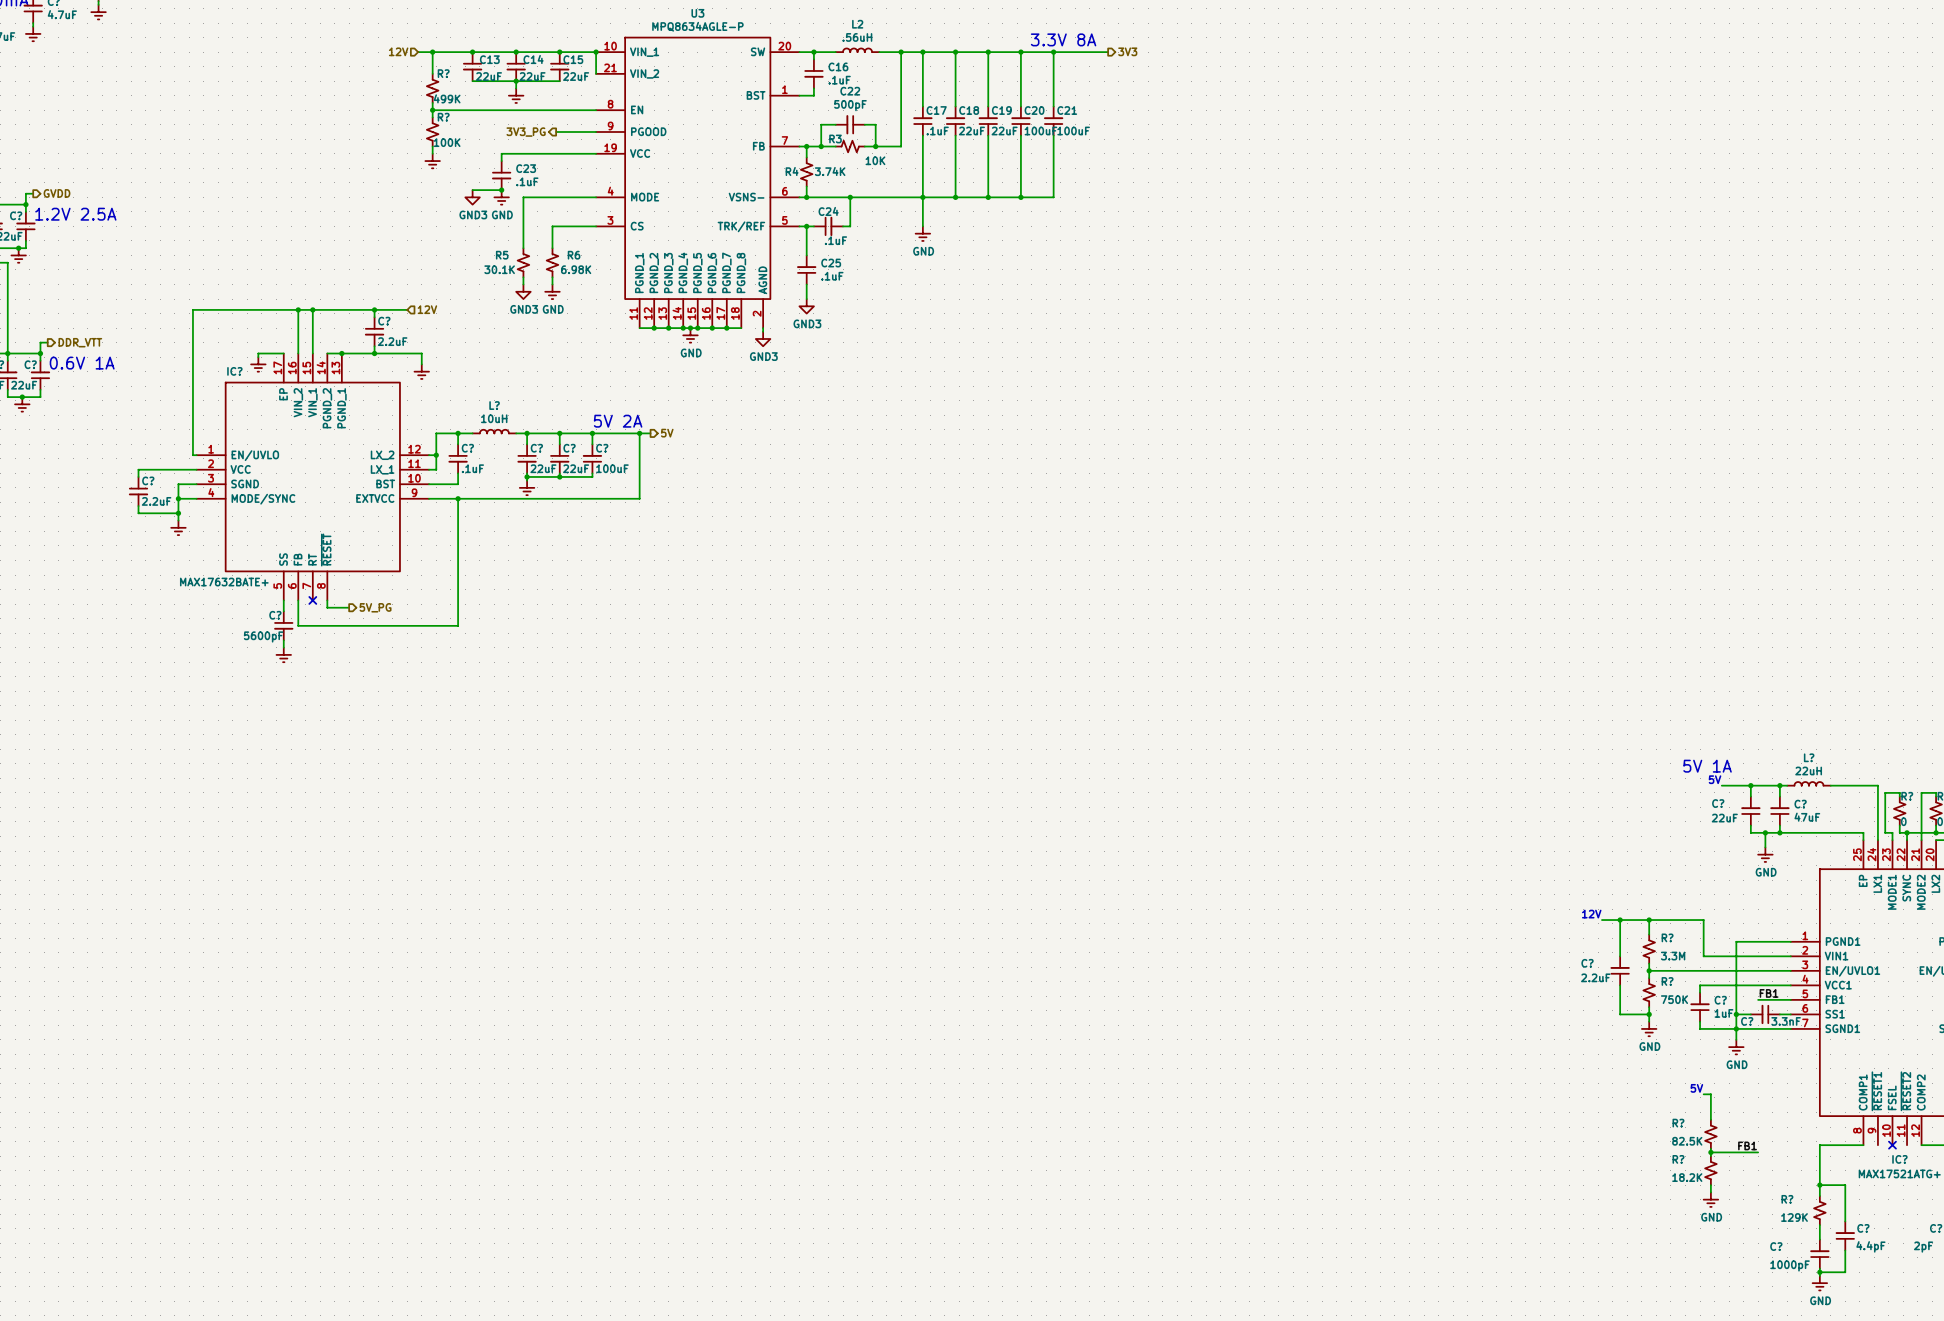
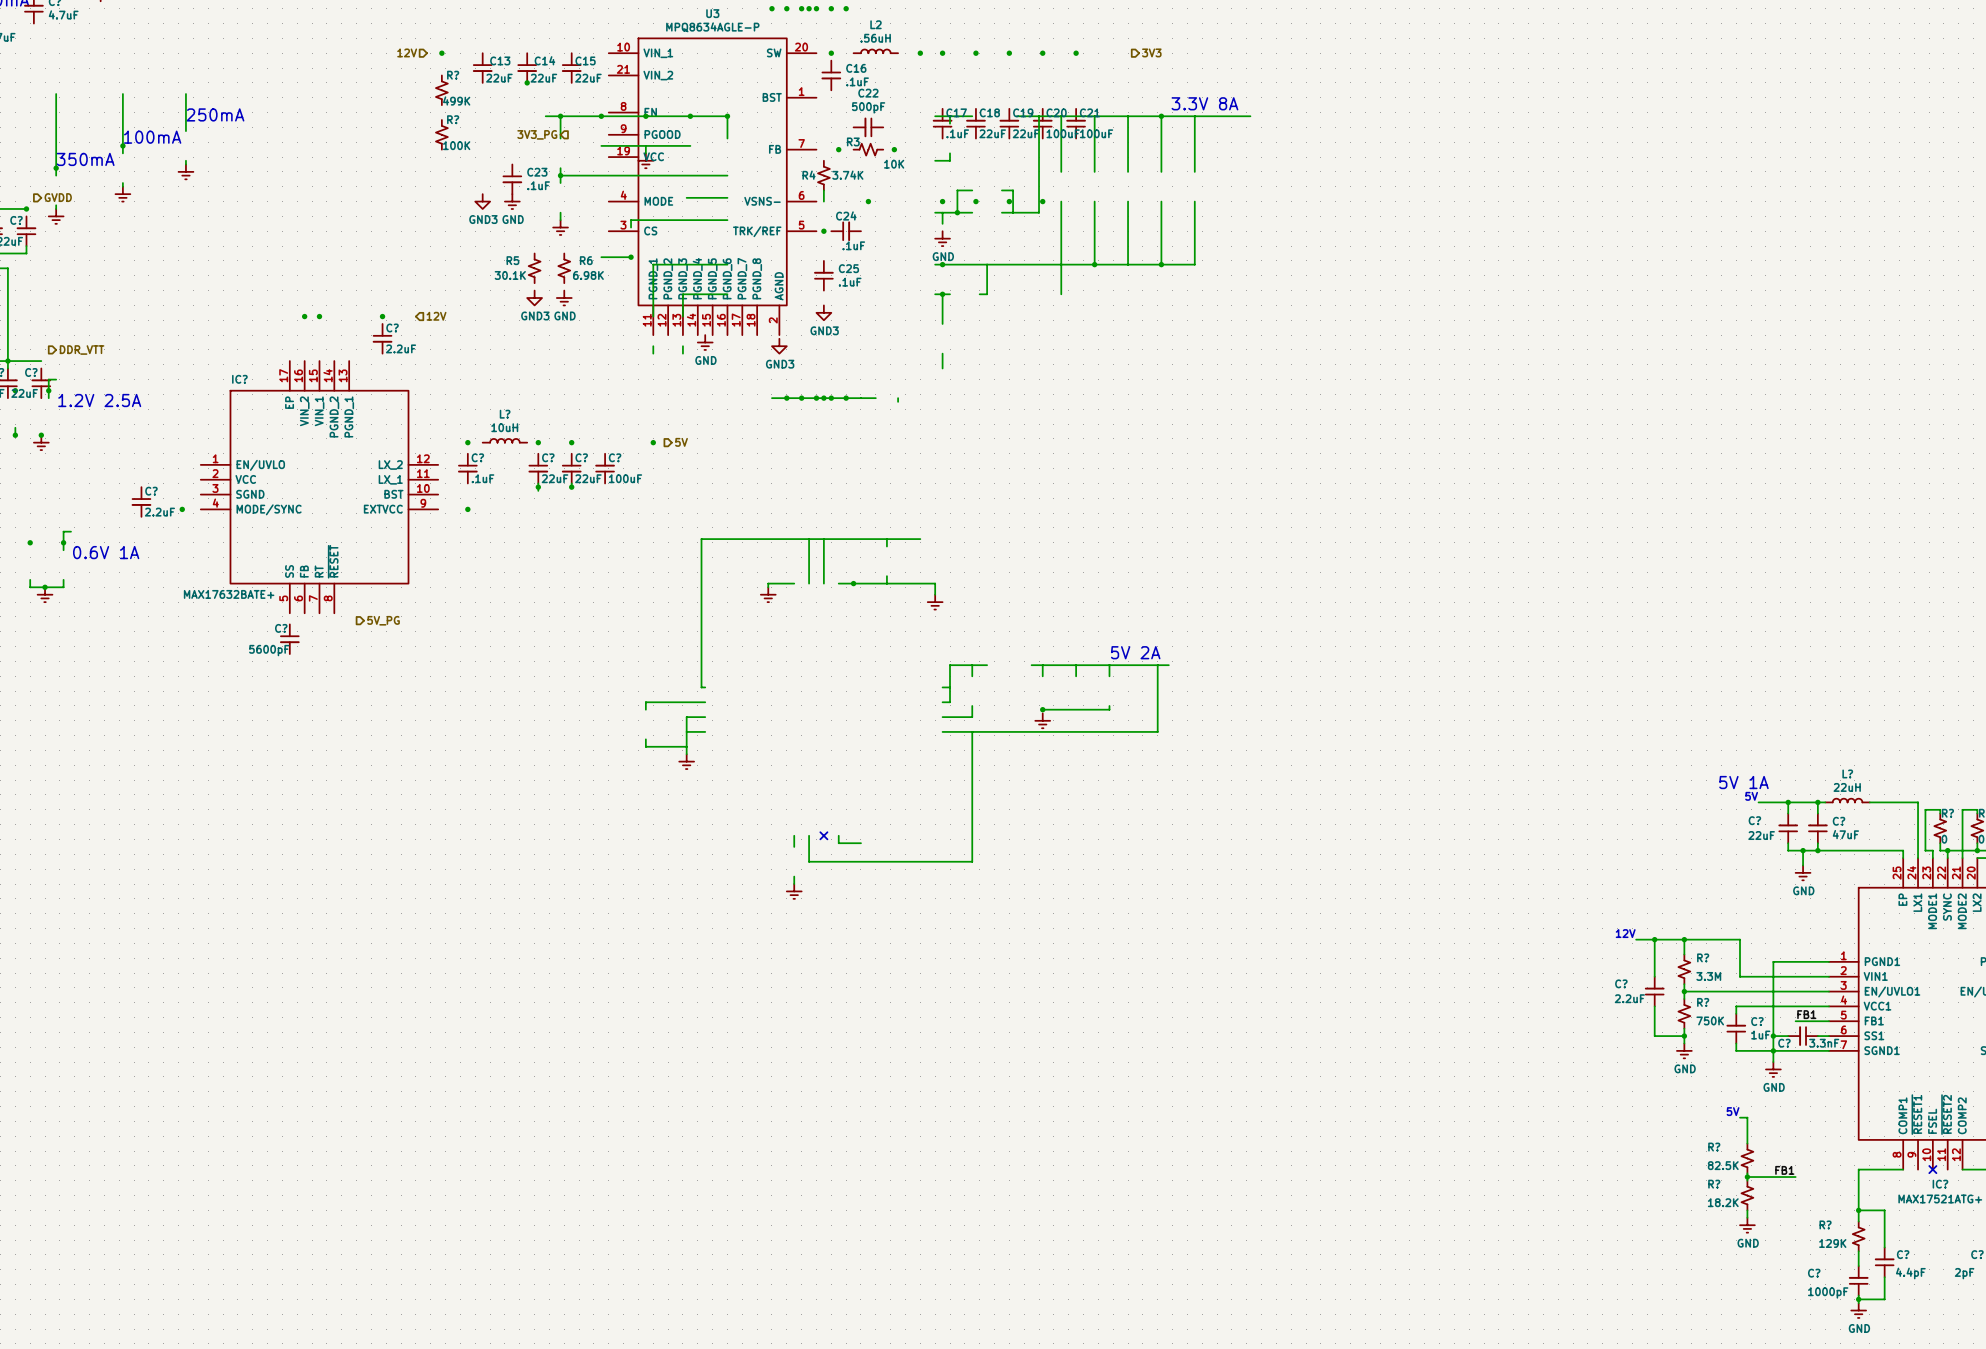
wire: (98, 1) (98, 4) -> none
junction: none -> (771, 8)
junction: none -> (786, 8)
junction: none -> (801, 8)
junction: none -> (809, 8)
junction: none -> (816, 8)
junction: none -> (831, 8)
junction: none -> (846, 8)
power symbol: (98, 12) -> none
wire: (33, 23) (33, 26) -> none
power symbol: (33, 33) -> none
text position: 3.3V 8A (1063, 39) -> 3.3V 8A (1204, 103)
wire: (418, 52) (596, 52) (596, 73) -> (545, 116) (727, 116) (727, 138)
wire: (432, 52) (432, 73) -> (560, 116) (560, 138)
junction: (472, 52) -> none
junction: (516, 52) -> none
junction: (559, 52) -> none
junction: (596, 52) -> none
wire: (799, 52) (835, 52) -> (935, 116) (972, 116)
wire: (813, 52) (813, 59) -> (950, 116) (950, 123)
wire: (879, 52) (1108, 52) -> (1016, 116) (1250, 116)
wire: (901, 52) (901, 146) (864, 146) -> (1039, 116) (1039, 212) (1001, 212)
wire: (922, 52) (922, 106) -> (1061, 116) (1061, 171)
wire: (955, 52) (955, 106) -> (1094, 116) (1094, 171)
wire: (988, 52) (988, 106) -> (1128, 116) (1128, 171)
wire: (1020, 52) (1020, 106) -> (1161, 116) (1161, 171)
wire: (1053, 52) (1053, 106) -> (1194, 116) (1194, 171)
wire: (472, 81) (559, 81) -> (601, 145) (690, 145)
wire: (516, 81) (516, 88) -> (645, 145) (645, 153)
wire: (813, 88) (813, 95) (799, 95) -> (950, 153) (950, 160) (935, 160)
wire: none -> (56, 94) (56, 175)
wire: none -> (122, 94) (122, 153)
wire: none -> (185, 94) (185, 131)
power symbol: (516, 95) -> none
wire: (432, 102) (432, 117) -> (560, 168) (560, 183)
wire: (432, 110) (596, 110) -> (560, 175) (727, 175)
junction: (432, 110) -> none
text: none -> 250mA (215, 114)
junction: none -> (560, 116)
junction: none -> (601, 116)
junction: none -> (645, 116)
junction: none -> (690, 116)
junction: none -> (727, 116)
junction: none -> (1161, 116)
wire: (835, 124) (821, 124) (821, 146) -> (972, 190) (957, 190) (957, 212)
wire: (864, 124) (875, 124) (875, 146) -> (1001, 190) (1013, 190) (1013, 212)
wire: (556, 131) (596, 131) -> (686, 197) (727, 197)
text: none -> 100mA (152, 137)
wire: (922, 135) (922, 208) -> none
wire: (955, 135) (955, 197) -> (1094, 201) (1094, 264)
wire: (988, 135) (988, 197) -> (1128, 201) (1128, 264)
wire: (1020, 135) (1020, 197) -> (1161, 201) (1161, 264)
wire: (1053, 135) (1053, 197) (799, 197) -> (1194, 201) (1194, 264) (935, 264)
junction: none -> (122, 145)
wire: (432, 146) (432, 153) -> (560, 212) (560, 220)
wire: (799, 146) (835, 146) -> (935, 212) (972, 212)
wire: (806, 146) (806, 157) -> none
junction: (806, 146) -> none
wire: (596, 153) (501, 153) (501, 161) -> (727, 220) (631, 220) (631, 227)
text: none -> 350mA (85, 159)
wire: none -> (185, 160) (185, 164)
power symbol: none -> (645, 160)
power symbol: (432, 161) -> none
junction: none -> (56, 168)
power symbol: none -> (185, 171)
junction: none -> (560, 175)
wire: none -> (122, 183) (122, 186)
power symbol: none -> (122, 194)
wire: (472, 190) (501, 190) -> (601, 257) (631, 257)
junction: (501, 190) -> none
wire: (33, 193) (25, 193) (25, 211) -> none
wire: (596, 197) (523, 197) (523, 248) -> (727, 264) (653, 264) (653, 316)
junction: (806, 197) -> none
wire: (850, 197) (850, 226) (843, 226) -> (987, 264) (987, 294) (979, 294)
wire: none -> (1061, 201) (1061, 294)
wire: none -> (56, 205) (56, 208)
junction: none -> (957, 212)
power symbol: none -> (56, 216)
text: 1.2V 2.5A (75, 214) -> none
wire: (922, 219) (922, 226) -> none
power symbol: none -> (560, 227)
wire: (596, 226) (552, 226) (552, 248) -> (727, 294) (682, 294) (682, 316)
wire: (799, 226) (813, 226) -> (935, 294) (950, 294)
wire: (806, 226) (806, 255) -> (942, 294) (942, 323)
junction: (18, 248) -> none
junction: none -> (631, 257)
power symbol: (18, 255) -> none
junction: none -> (942, 264)
junction: none -> (1094, 264)
junction: none -> (1161, 264)
wire: (523, 277) (523, 284) -> (653, 346) (653, 353)
wire: (552, 277) (552, 284) -> (682, 346) (682, 353)
wire: (806, 284) (806, 299) -> (942, 353) (942, 368)
junction: none -> (942, 294)
wire: (298, 309) (298, 353) -> none
wire: (312, 309) (312, 353) -> none
wire: (374, 309) (374, 317) -> none
wire: (407, 309) (192, 309) (192, 455) (196, 455) -> none
wire: (639, 328) (741, 328) -> (771, 398) (875, 398)
junction: (654, 328) -> none
junction: (668, 328) -> none
junction: (683, 328) -> none
junction: (690, 328) -> none
junction: (697, 328) -> none
junction: (712, 328) -> none
junction: (726, 328) -> none
wire: (763, 328) (763, 331) -> (898, 398) (898, 401)
wire: (47, 342) (40, 342) (40, 360) -> (56, 379) (48, 379) (48, 398)
wire: (374, 346) (374, 353) -> none
junction: (40, 353) -> none
wire: (283, 353) (258, 353) (258, 357) -> none
wire: (327, 353) (421, 353) (421, 364) -> none
junction: (341, 353) -> none
junction: (374, 353) -> none
text: 0.6V 1A (82, 363) -> none
power symbol: (258, 364) -> none
power symbol: (421, 371) -> none
junction: none -> (15, 390)
junction: none -> (48, 390)
wire: (7, 389) (7, 397) (40, 397) (40, 389) -> none
junction: none -> (786, 398)
junction: none -> (801, 398)
junction: none -> (816, 398)
junction: none -> (823, 398)
junction: none -> (831, 398)
junction: none -> (846, 398)
text: none -> 1.2V 2.5A (99, 400)
junction: (22, 397) -> none
power symbol position: (22, 404) -> (41, 442)
wire: none -> (15, 427) (15, 435)
text: 5V 2A (618, 421) -> none
junction: none -> (15, 435)
junction: none -> (41, 435)
wire: (458, 433) (458, 444) -> none
wire: (472, 433) (436, 433) (436, 469) (429, 469) -> none
wire: (516, 433) (650, 433) -> none
wire: (527, 433) (527, 444) -> none
wire: (559, 433) (559, 444) -> none
wire: (592, 433) (592, 444) -> none
junction: (592, 433) -> none
wire: (639, 433) (639, 498) (429, 498) -> none
wire: (429, 455) (436, 455) -> none
junction: (436, 455) -> none
wire: (196, 469) (138, 469) (138, 476) -> none
wire: (458, 473) (458, 484) (429, 484) -> none
wire: (592, 473) (592, 476) (527, 476) -> none
wire: (196, 484) (178, 484) (178, 520) -> none
power symbol: (527, 487) -> none
wire: (178, 498) (196, 498) -> none
wire: (458, 498) (458, 625) (298, 625) (298, 600) -> none
wire: (138, 506) (138, 513) (178, 513) -> none
junction: (178, 513) -> none
wire: none -> (70, 531) (63, 531) (63, 550)
power symbol: (178, 527) -> none
wire: none -> (809, 539) (809, 583)
wire: none -> (823, 539) (823, 583)
wire: none -> (886, 539) (886, 546)
wire: none -> (920, 539) (701, 539) (701, 687) (705, 687)
junction: none -> (30, 542)
junction: none -> (63, 542)
text: none -> 0.6V 1A (106, 552)
wire: none -> (886, 576) (886, 583)
wire: none -> (30, 579) (30, 587) (63, 587) (63, 579)
wire: none -> (794, 583) (768, 583) (768, 587)
wire: none -> (838, 583) (935, 583) (935, 594)
junction: none -> (853, 583)
junction: none -> (45, 587)
power symbol: none -> (45, 594)
power symbol: none -> (768, 594)
power symbol: none -> (935, 602)
wire: (283, 600) (283, 611) -> none
no-connect mark: (312, 600) -> none
wire: (327, 600) (327, 607) (349, 607) -> none
text: none -> 5V 2A (1135, 652)
wire: (283, 640) (283, 647) -> none
wire: none -> (972, 665) (972, 676)
wire: none -> (987, 665) (950, 665) (950, 702) (942, 702)
wire: none -> (1031, 665) (1168, 665)
wire: none -> (1042, 665) (1042, 676)
wire: none -> (1076, 665) (1076, 676)
wire: none -> (1109, 665) (1109, 676)
wire: none -> (1157, 665) (1157, 731) (942, 731)
power symbol: (283, 654) -> none
wire: none -> (942, 687) (950, 687)
wire: none -> (705, 702) (645, 702) (645, 709)
wire: none -> (972, 705) (972, 717) (942, 717)
wire: none -> (1109, 705) (1109, 709) (1042, 709)
junction: none -> (1042, 709)
wire: none -> (705, 717) (686, 717) (686, 754)
power symbol: none -> (1042, 720)
wire: none -> (686, 731) (705, 731)
wire: none -> (972, 731) (972, 861) (809, 861) (809, 835)
wire: none -> (645, 739) (645, 746) (686, 746)
power symbol: none -> (686, 761)
wire: none -> (794, 835) (794, 846)
no-connect mark: none -> (823, 835)
wire: none -> (838, 835) (838, 843) (860, 843)
wire: none -> (794, 876) (794, 884)
power symbol: none -> (794, 891)

